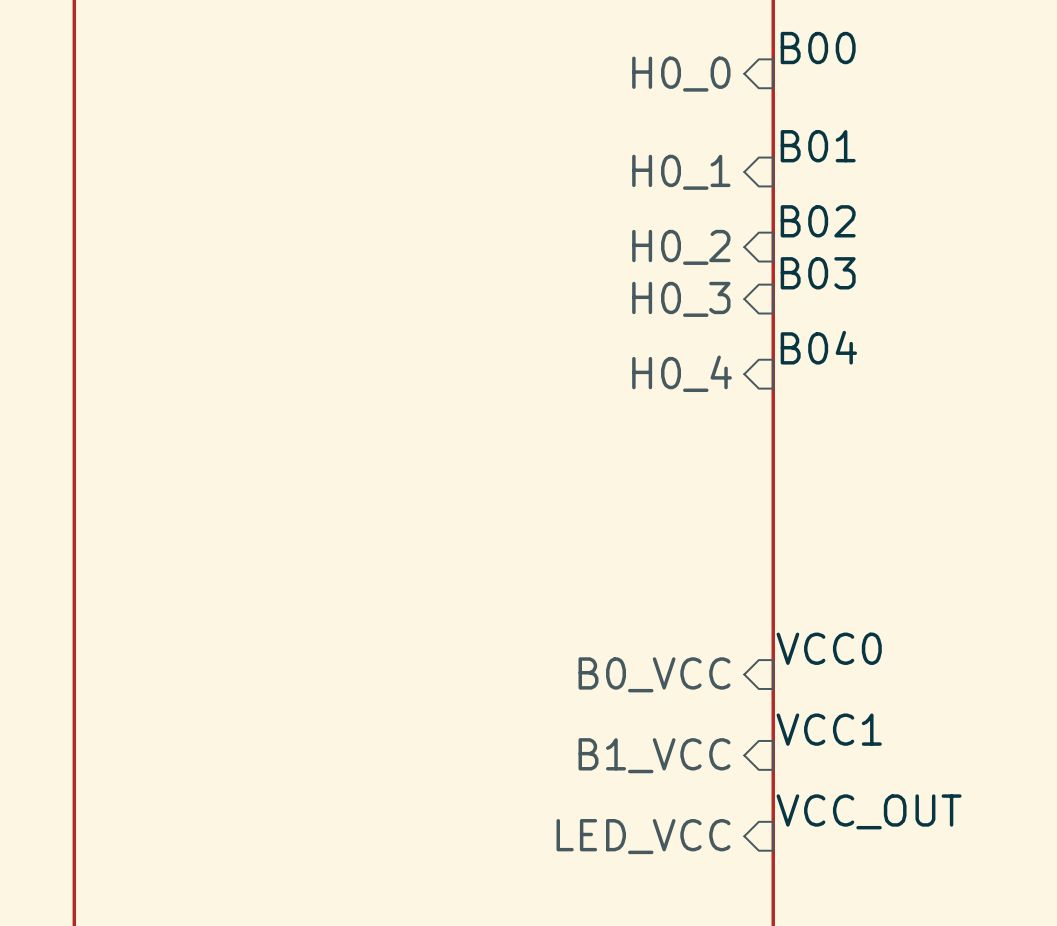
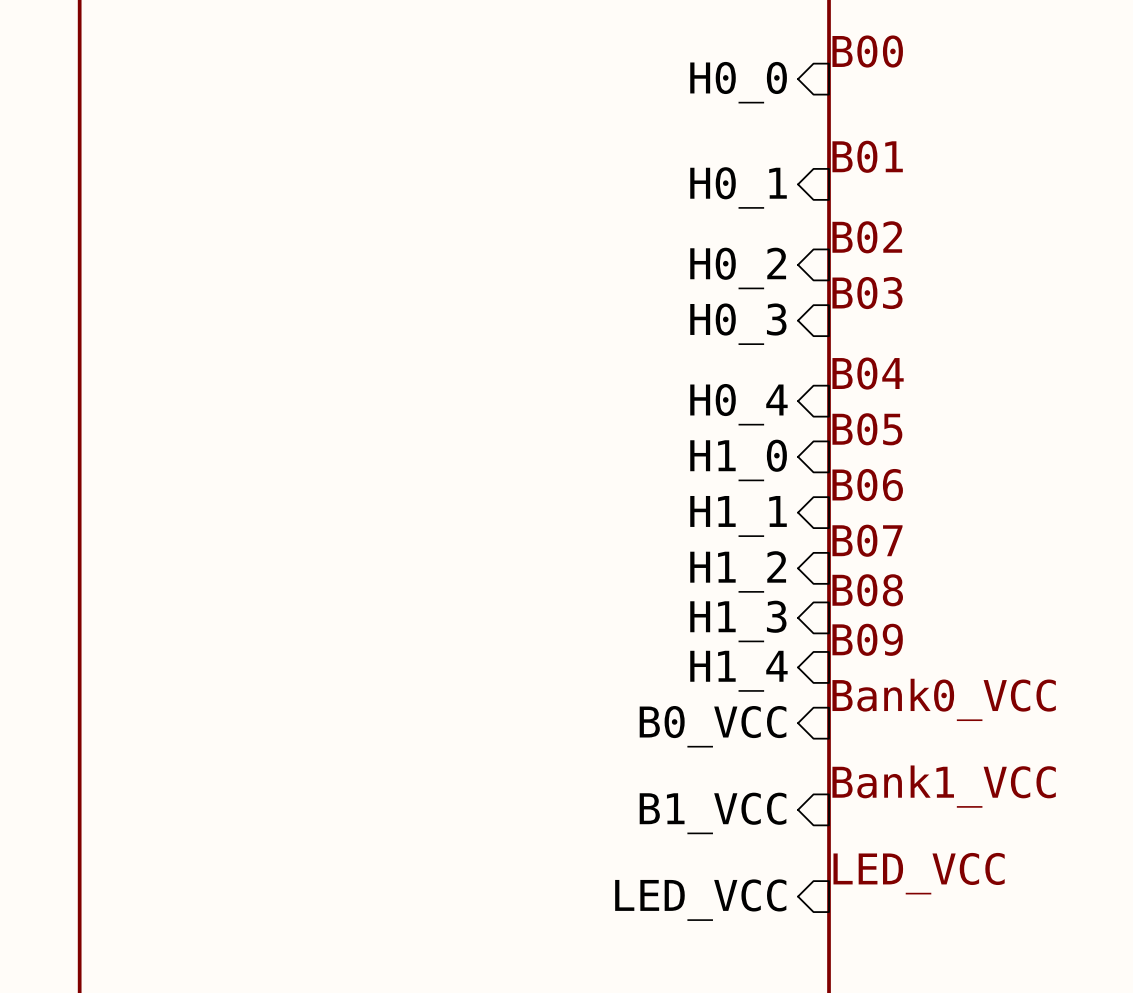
label: none -> B05 (867, 429)
sheet pin: none -> H1_0 (738, 460)
label: none -> B06 (867, 485)
sheet pin: none -> H1_1 (738, 516)
label: none -> B07 (867, 540)
sheet pin: none -> H1_2 (738, 571)
label: none -> B08 (867, 590)
sheet pin: none -> H1_3 (738, 621)
label: none -> B09 (867, 639)
sheet pin: none -> H1_4 (738, 671)
label: VCC0 (829, 648) -> Bank0_VCC (944, 699)
label: VCC1 (829, 729) -> Bank1_VCC (944, 786)
label: VCC_OUT (869, 811) -> LED_VCC (919, 873)

